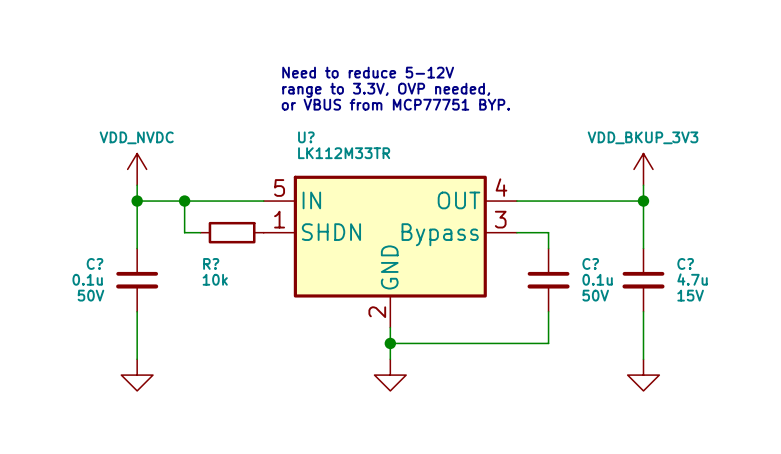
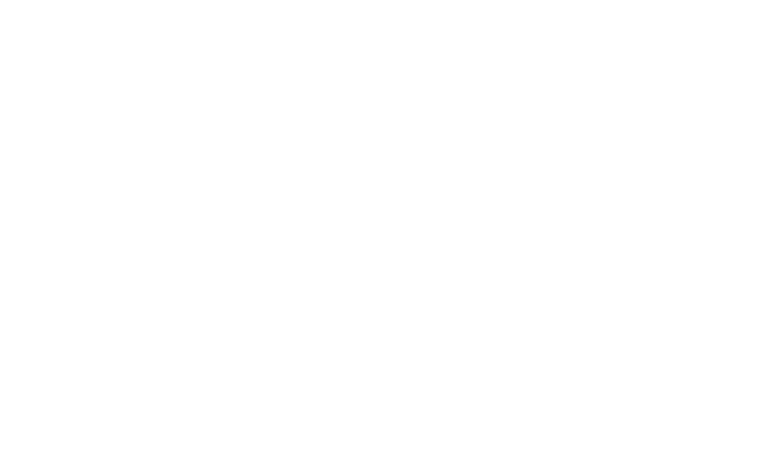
text: Need to reduce 5-12V (368, 72) -> none
text: range to 3.3V, OVP needed, (386, 90) -> none
text: or VBUS from MCP77751 BYP. (395, 104) -> none
power symbol: VDD_NVDC (137, 169) -> none
power symbol: VDD_BKUP_3V3 (643, 169) -> none
wire: (137, 185) (137, 248) -> none
wire: (643, 185) (643, 248) -> none
wire: (137, 201) (263, 201) -> none
junction: (137, 201) -> none
wire: (184, 201) (184, 232) (200, 232) -> none
junction: (184, 201) -> none
wire: (516, 201) (643, 201) -> none
junction: (643, 201) -> none
R?: 10k (232, 232) -> none
wire: (516, 232) (548, 232) (548, 248) -> none
U?: LK112M33TR (390, 251) -> none
C?: 0.1u (137, 280) -> none
C?: 0.1u (548, 280) -> none
C?: 4.7u (643, 280) -> none
wire: (137, 311) (137, 359) -> none
wire: (548, 311) (548, 343) (390, 343) -> none
wire: (643, 311) (643, 359) -> none
wire: (390, 327) (390, 359) -> none
junction: (390, 343) -> none
power symbol: (137, 375) -> none
power symbol: (390, 375) -> none
power symbol: (643, 375) -> none

